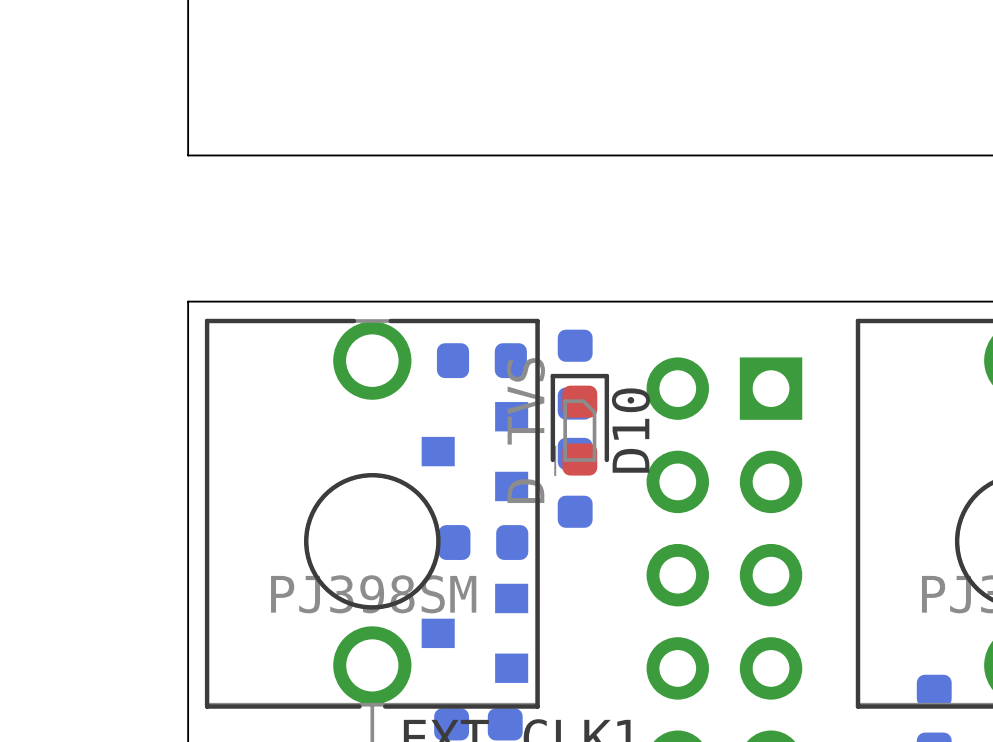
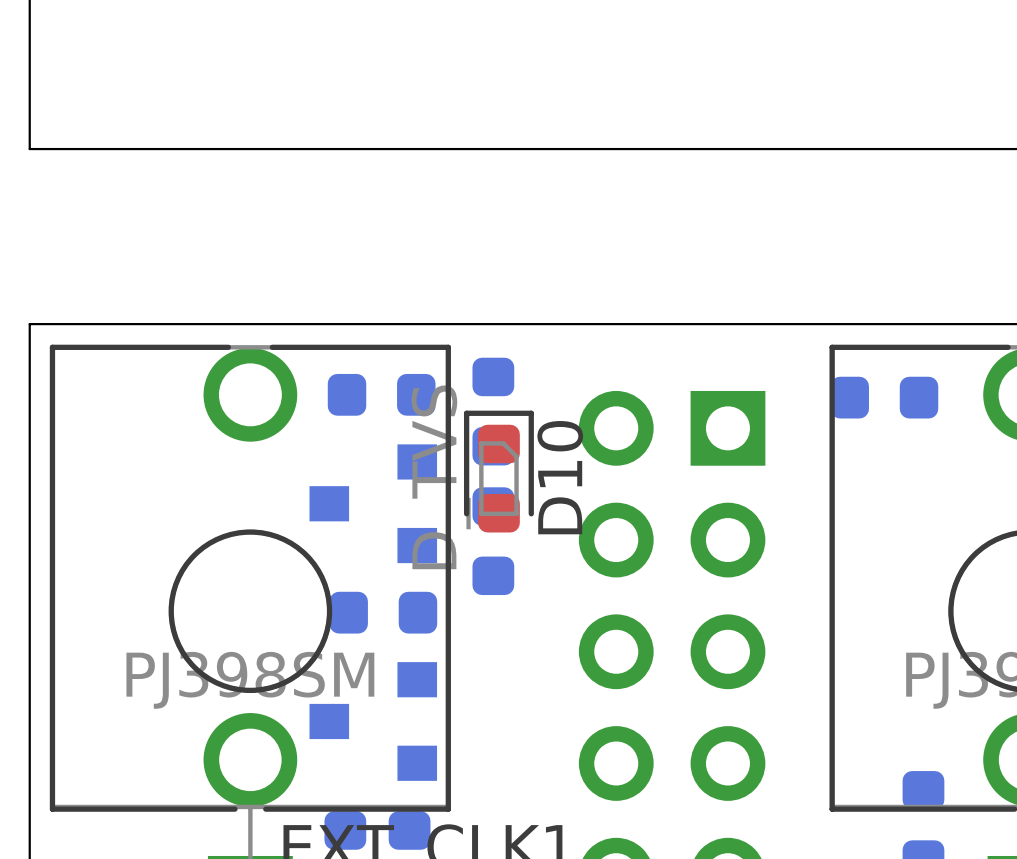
part: none -> (884, 397)

